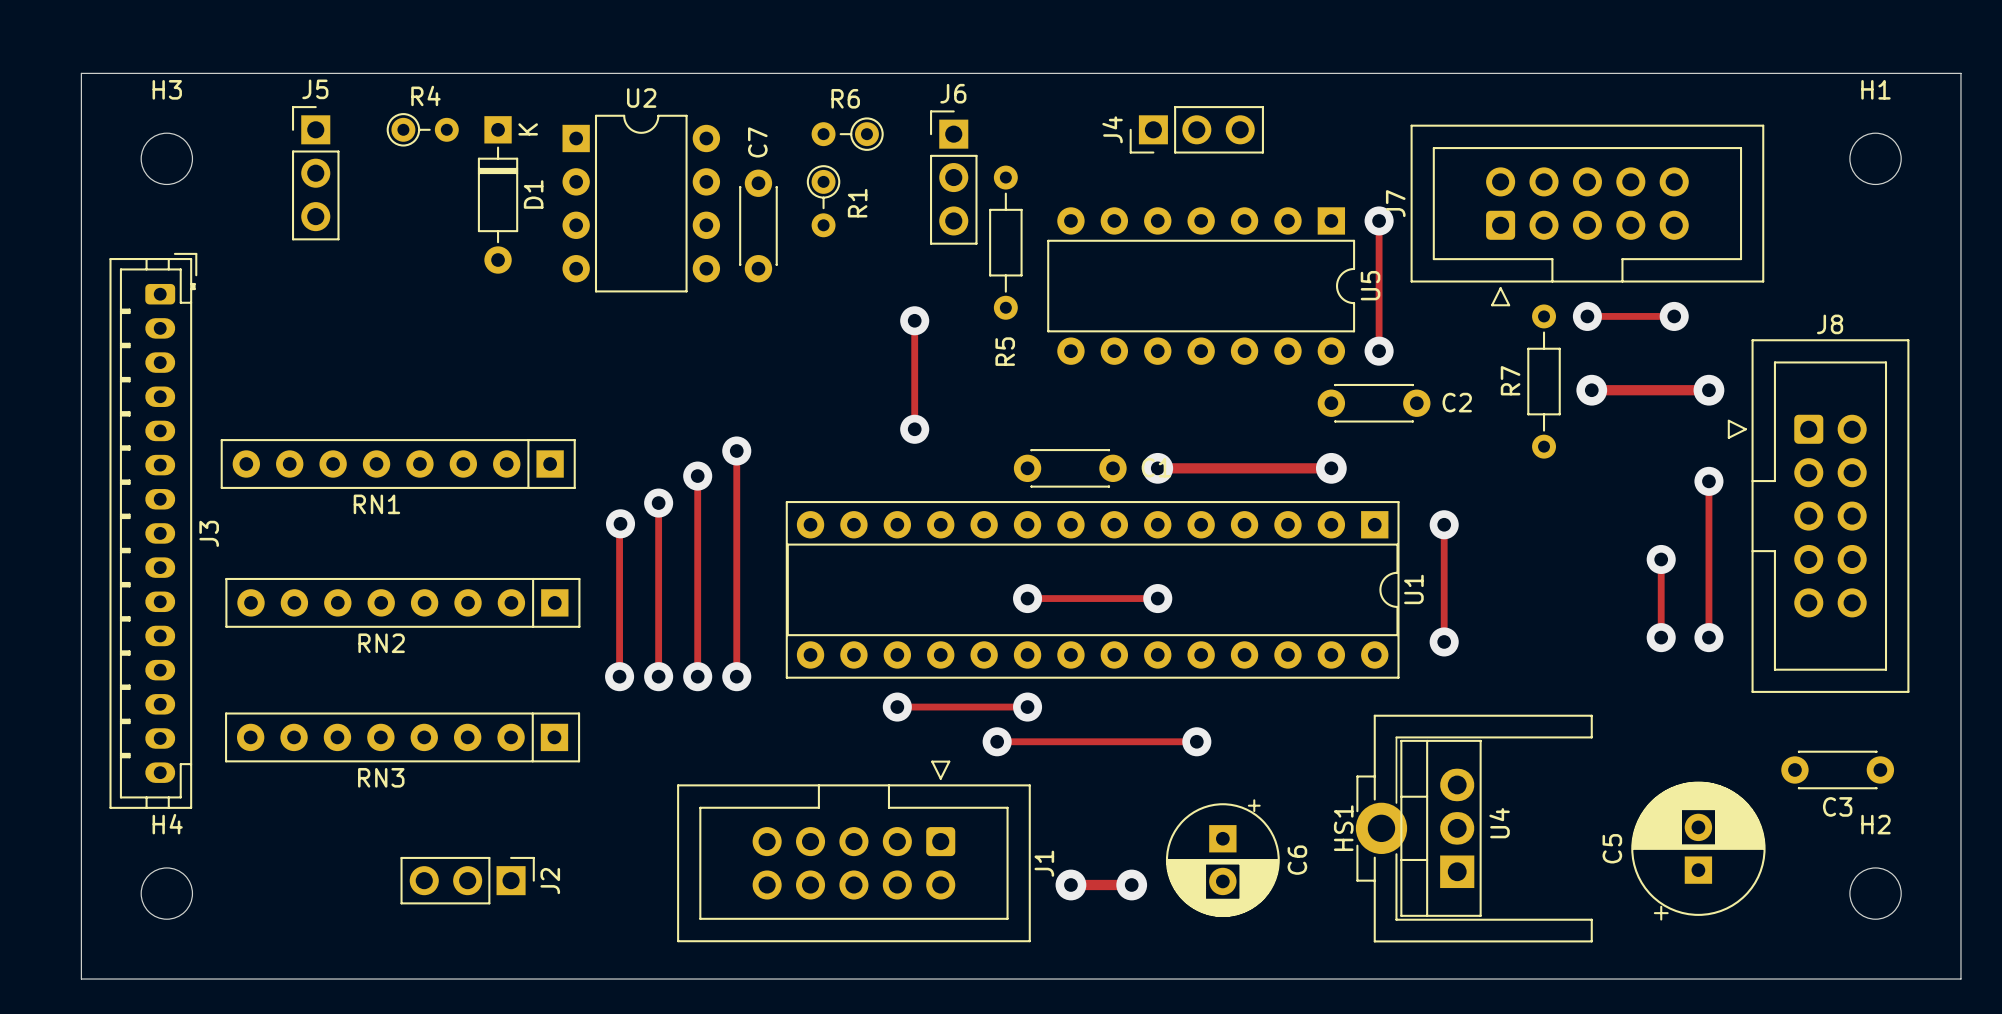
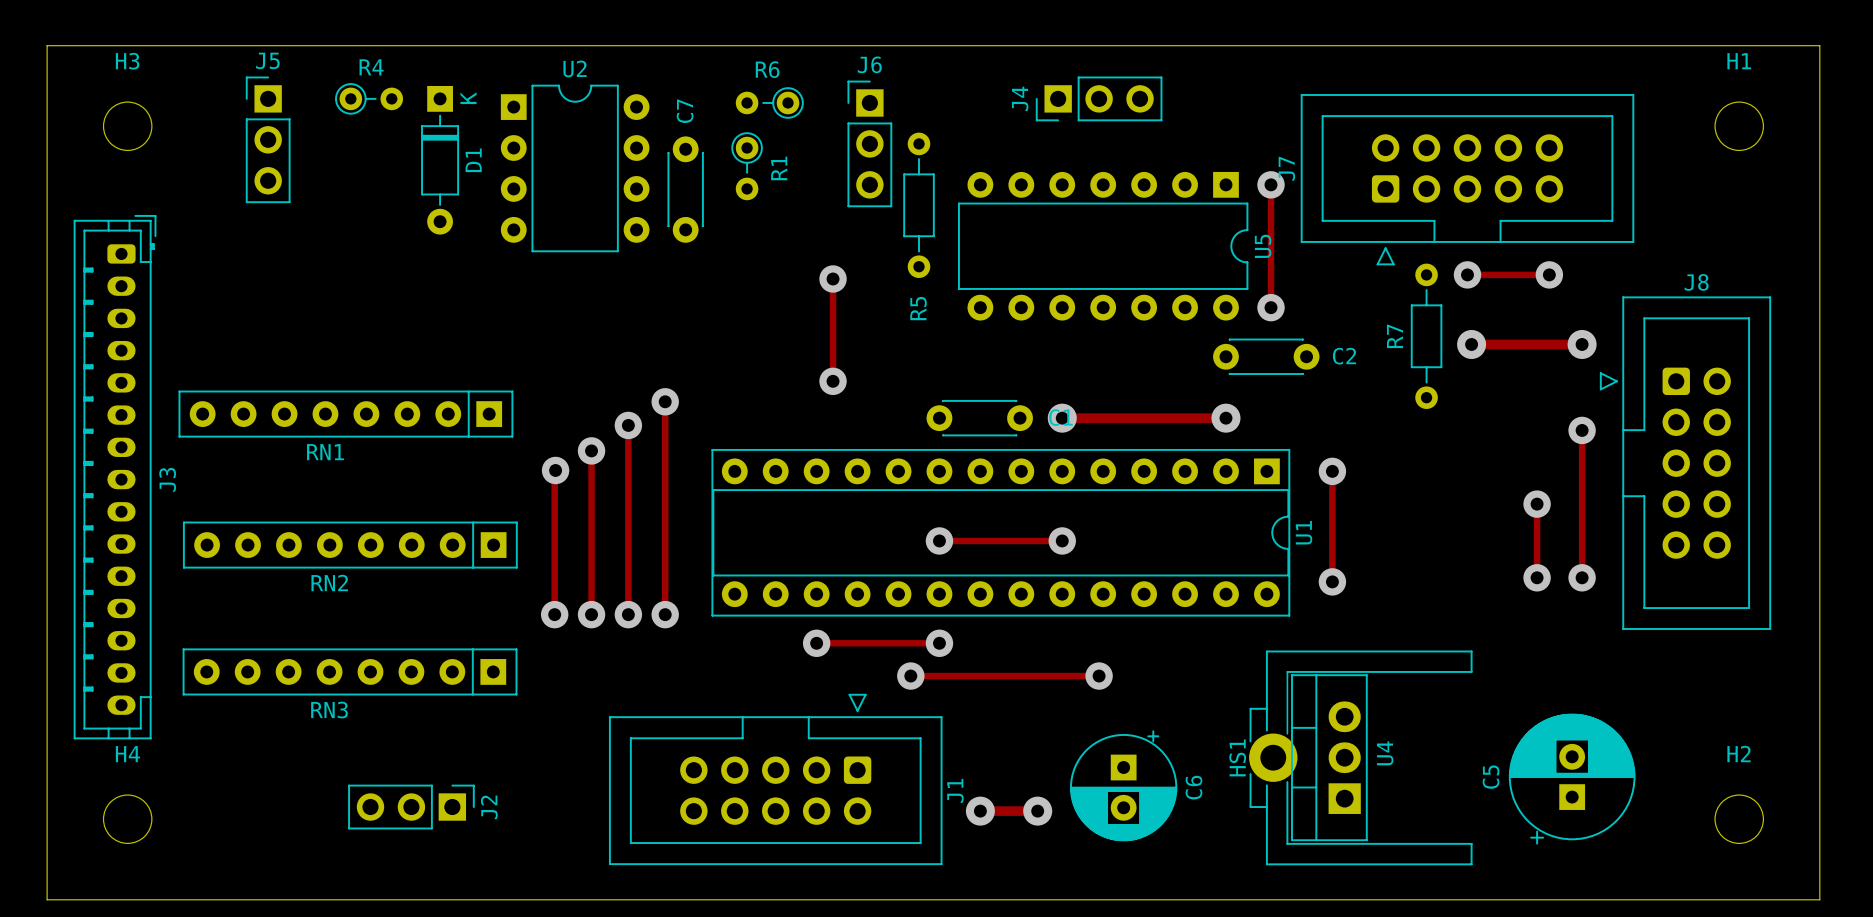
C3: (1837, 769) -> none

